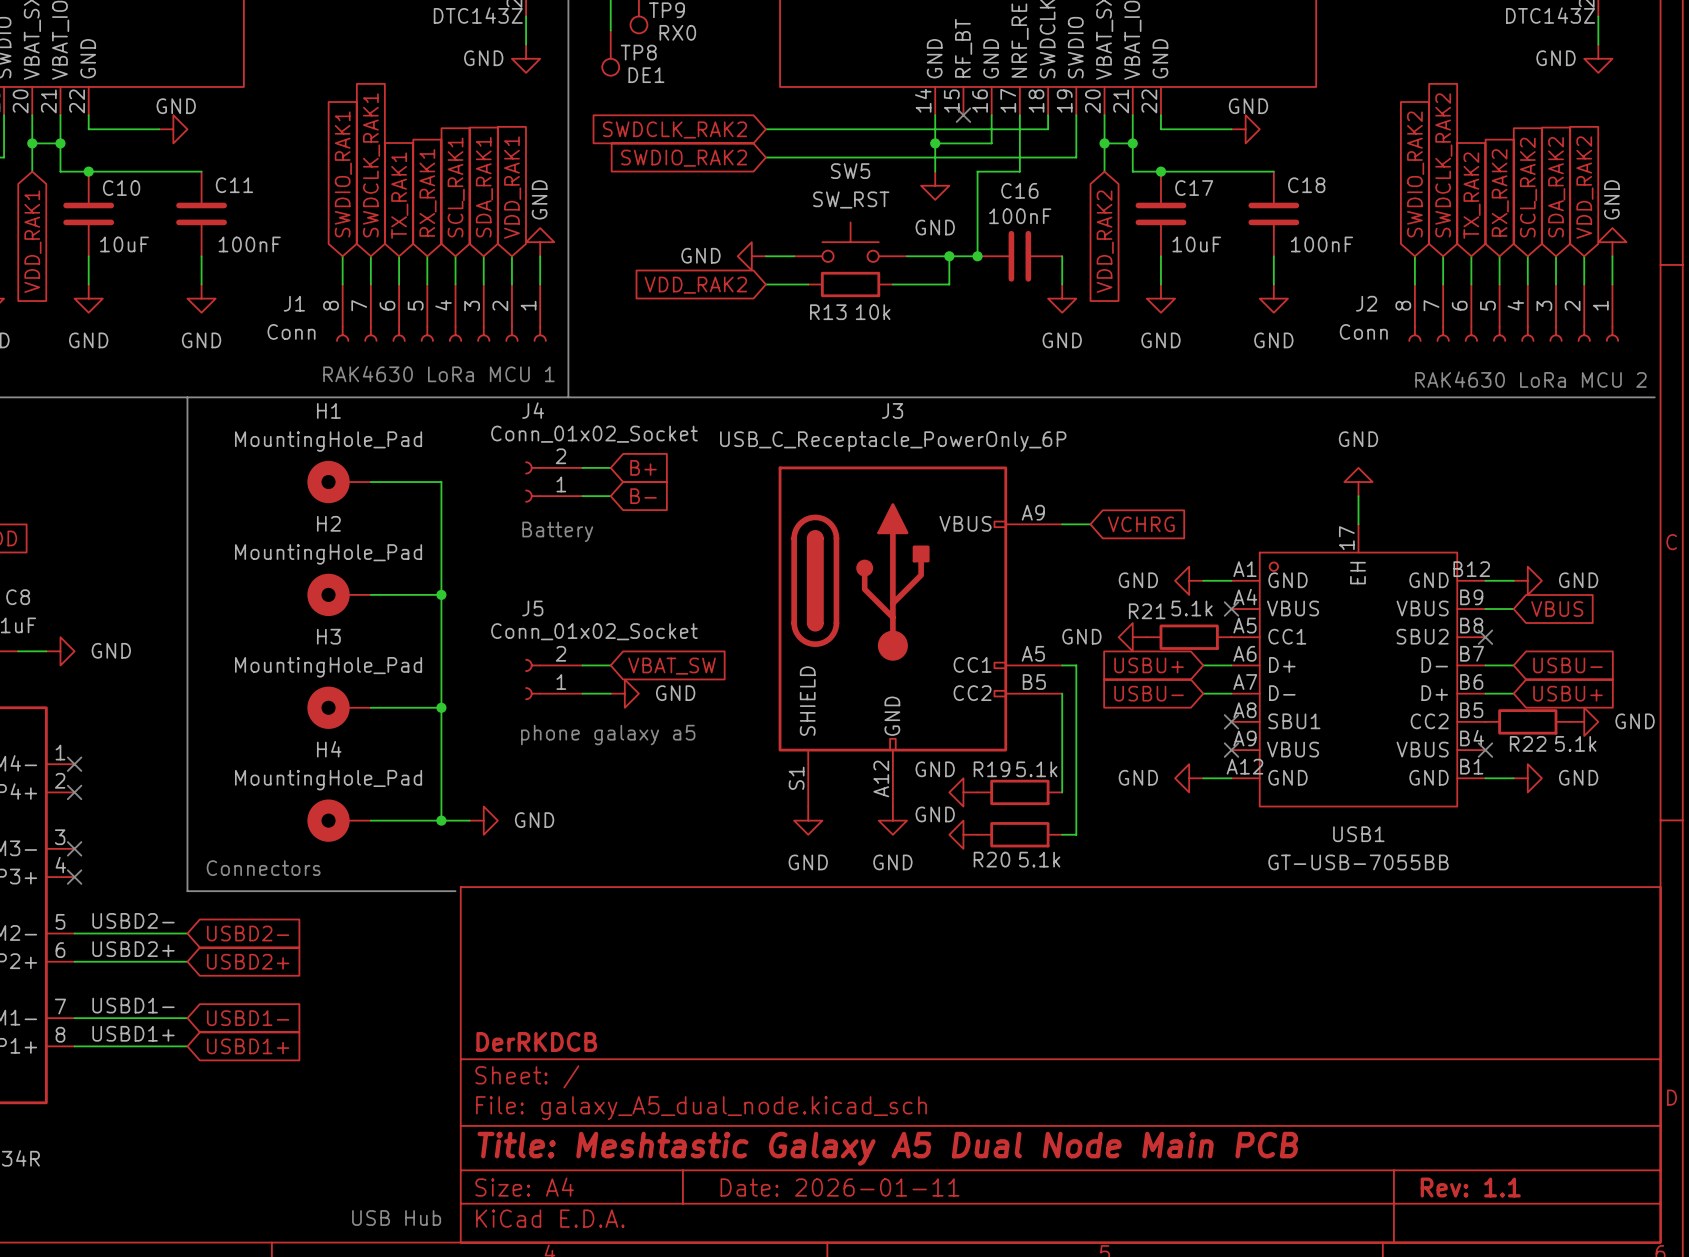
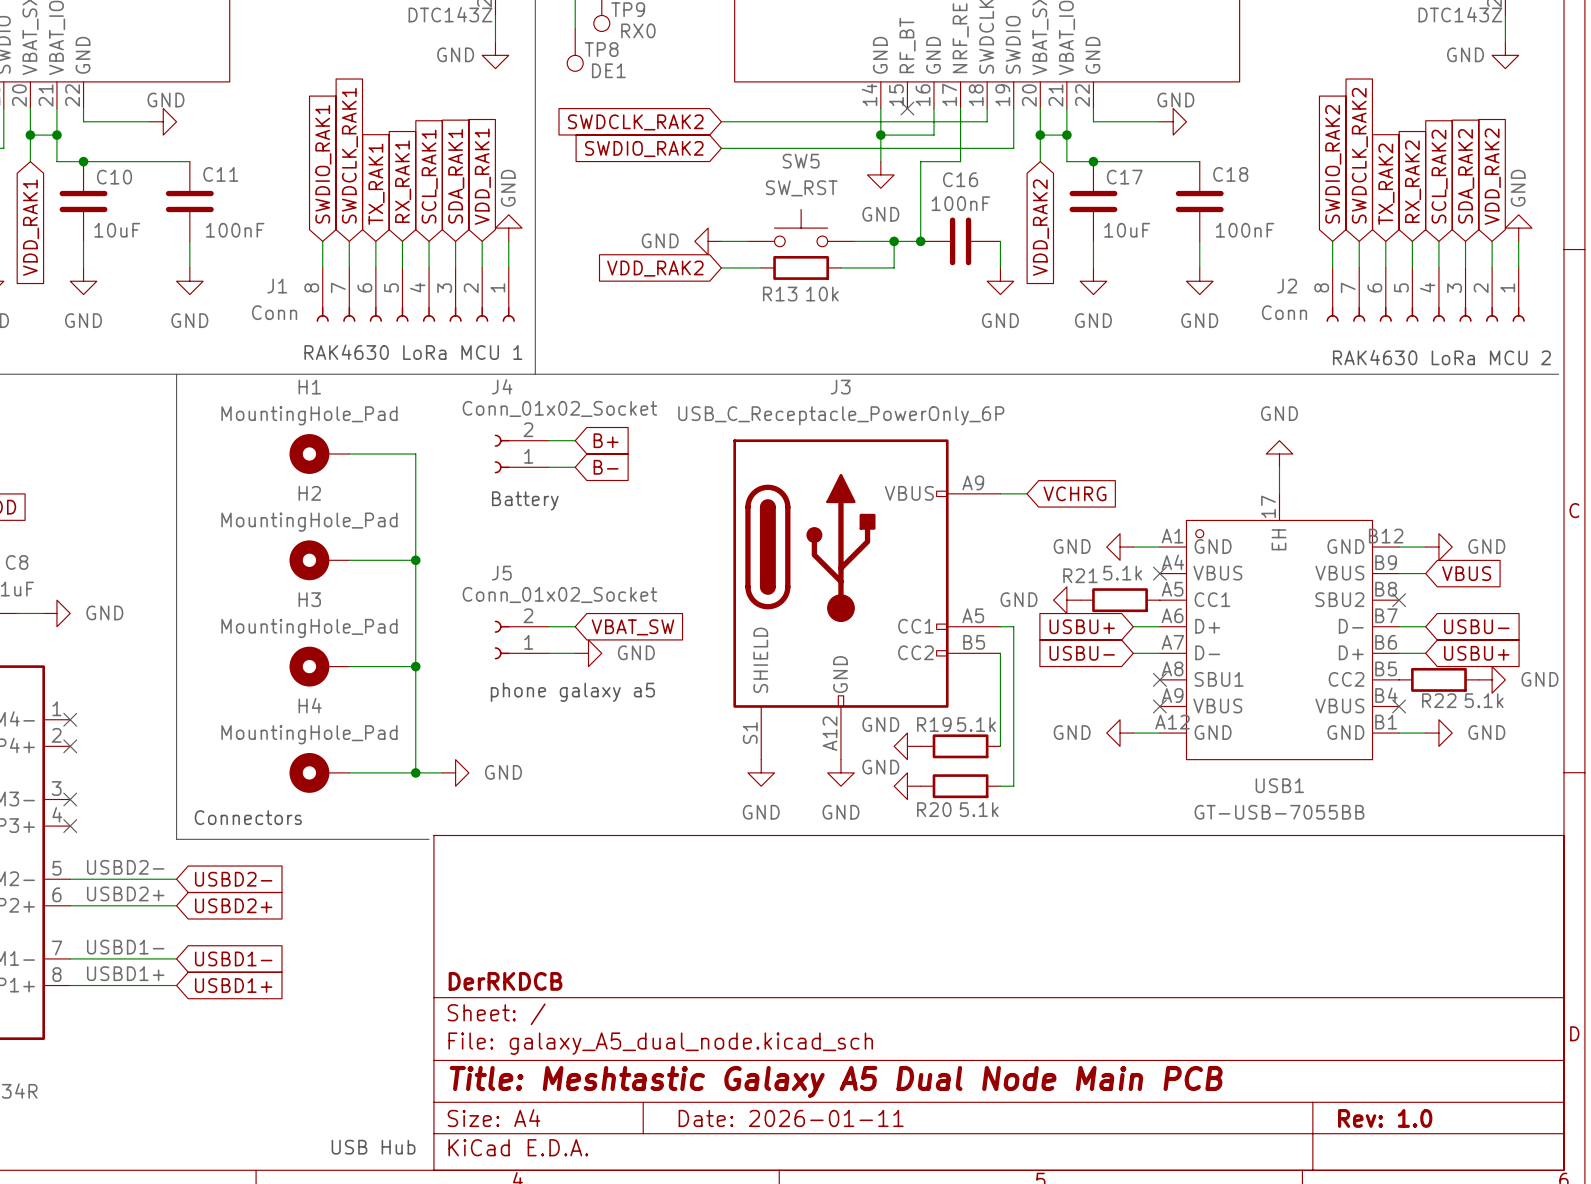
title block: Rev: 1.1 (1470, 1187) -> Rev: 1.0 (1385, 1118)

